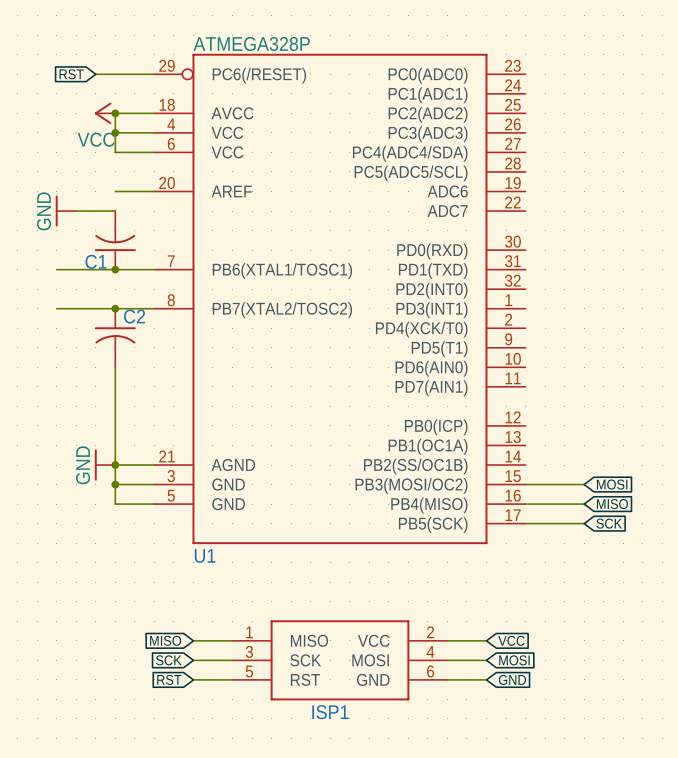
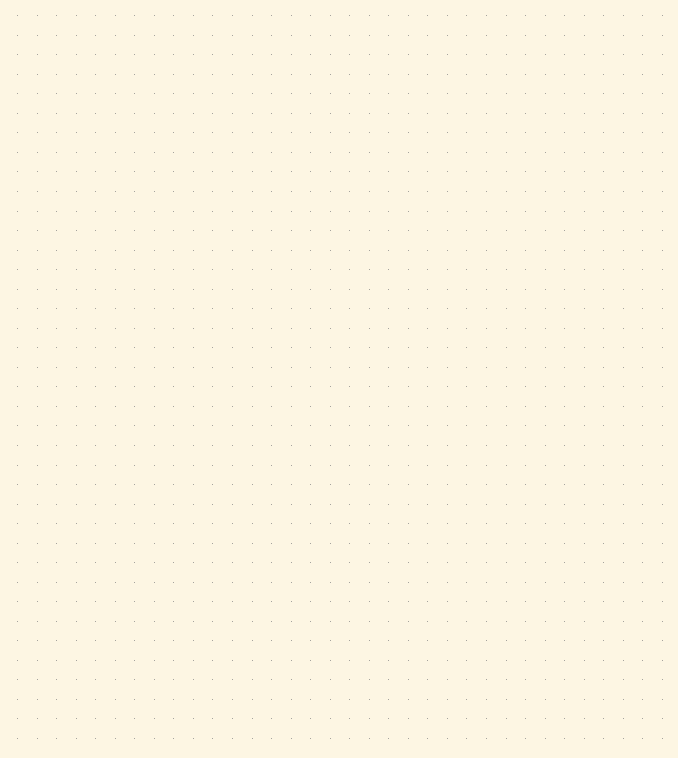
global label: RST (71, 74) -> none
wire: (95, 74) (154, 74) -> none
power symbol: VCC (105, 113) -> none
junction: (115, 113) -> none
wire: (154, 113) (115, 113) (115, 152) (154, 152) -> none
wire: (115, 132) (154, 132) -> none
junction: (115, 132) -> none
wire: (115, 191) (154, 191) -> none
power symbol: GND (65, 211) -> none
wire: (76, 211) (115, 211) -> none
C1: (115, 240) -> none
wire: (56, 269) (154, 269) -> none
junction: (115, 269) -> none
U1: ATMEGA328P (339, 298) -> none
wire: (56, 308) (154, 308) -> none
junction: (115, 308) -> none
C2: (115, 338) -> none
wire: (115, 367) (115, 504) (154, 504) -> none
power symbol: GND (105, 465) -> none
wire: (115, 465) (154, 465) -> none
junction: (115, 465) -> none
wire: (115, 484) (154, 484) -> none
junction: (115, 484) -> none
wire: (525, 484) (584, 484) -> none
global label: MOSI (612, 484) -> none
wire: (525, 504) (584, 504) -> none
global label: MISO (612, 504) -> none
wire: (525, 523) (584, 523) -> none
global label: SCK (609, 523) -> none
global label: MISO (165, 640) -> none
wire: (193, 640) (232, 640) -> none
wire: (447, 640) (486, 640) -> none
global label: VCC (511, 640) -> none
global label: SCK (168, 660) -> none
wire: (193, 660) (232, 660) -> none
ISP1: (339, 660) -> none
wire: (447, 660) (486, 660) -> none
global label: MOSI (514, 660) -> none
global label: RST (169, 679) -> none
wire: (193, 679) (232, 679) -> none
wire: (447, 679) (486, 679) -> none
global label: GND (512, 679) -> none

